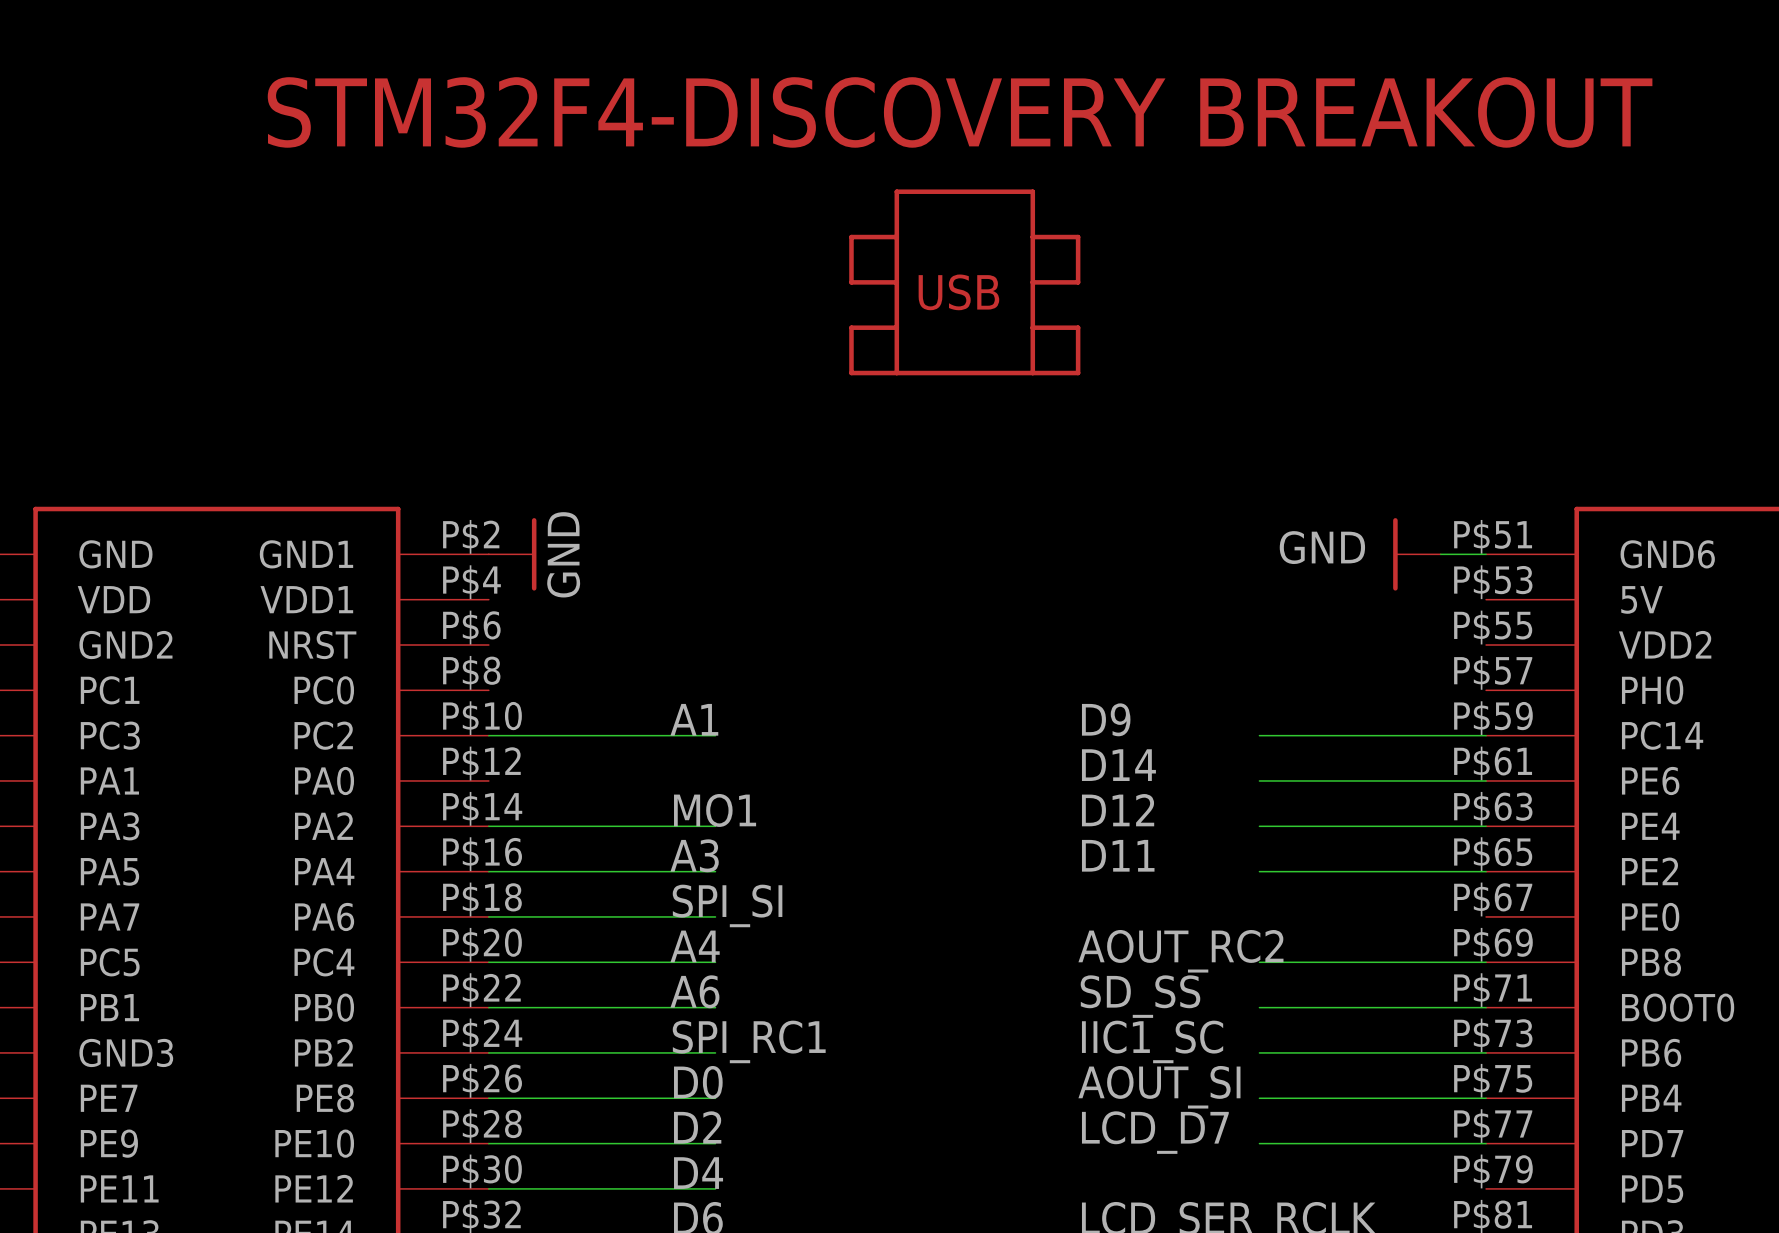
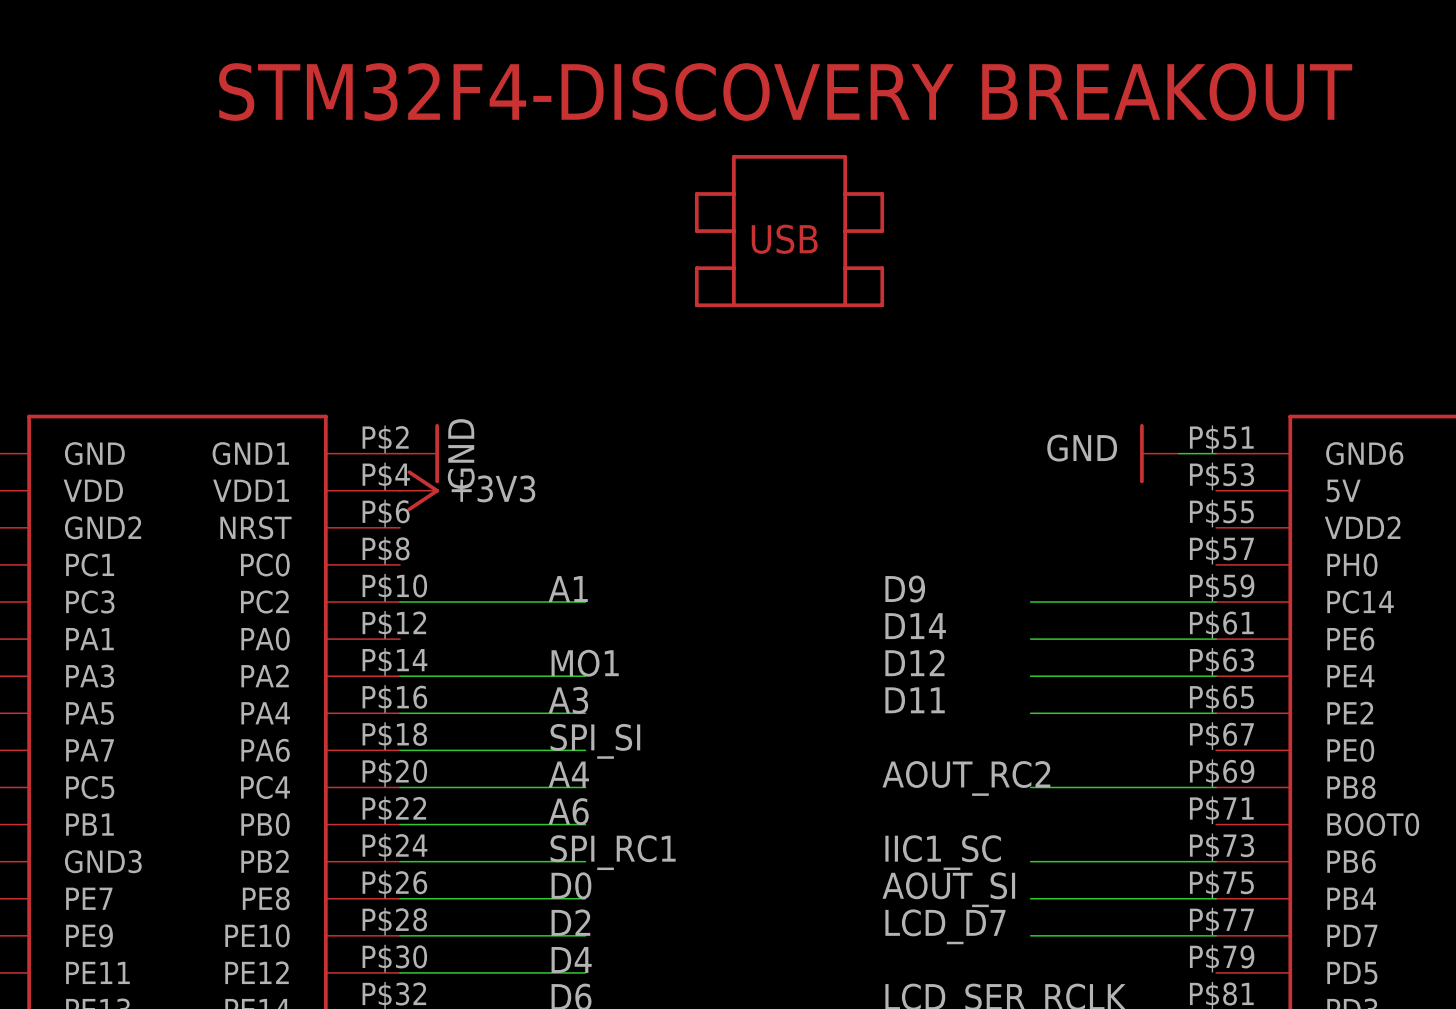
power symbol: none -> +3V3 (419, 490)
label: SD_SS (1140, 996) -> none
wire: (1259, 1007) (1486, 1007) -> none

